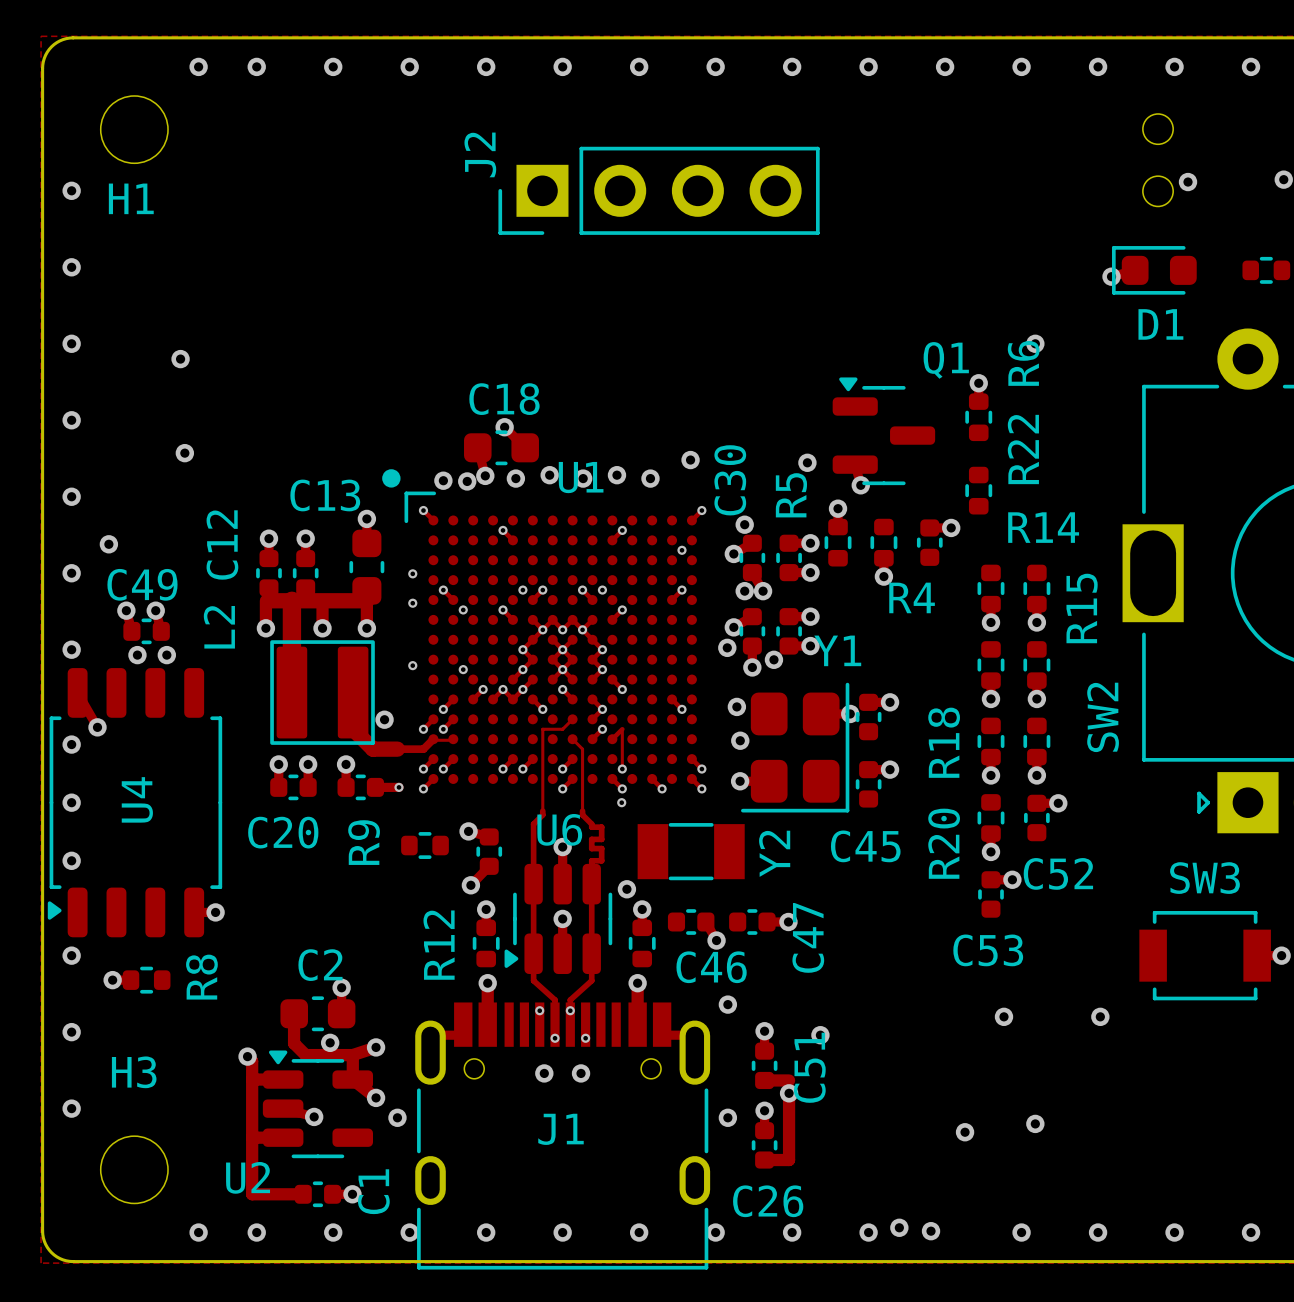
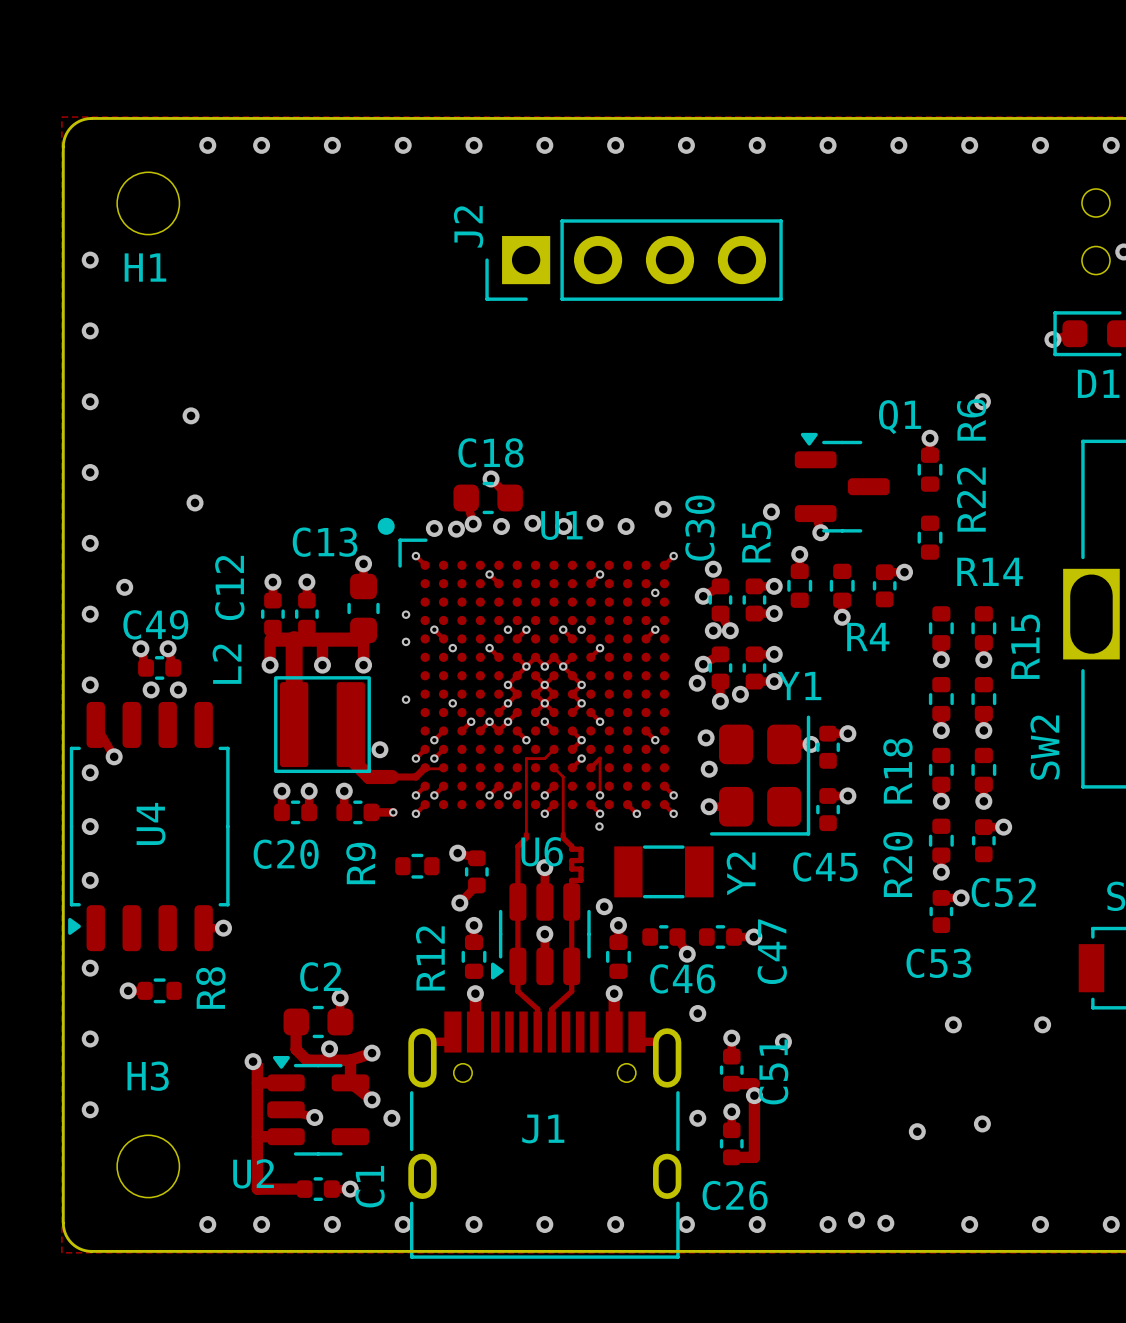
via: (539, 1010) -> none
via: (570, 1010) -> none
via: (555, 1038) -> none
via: (585, 1038) -> none
via: (544, 1073) -> none
via: (581, 1073) -> none

